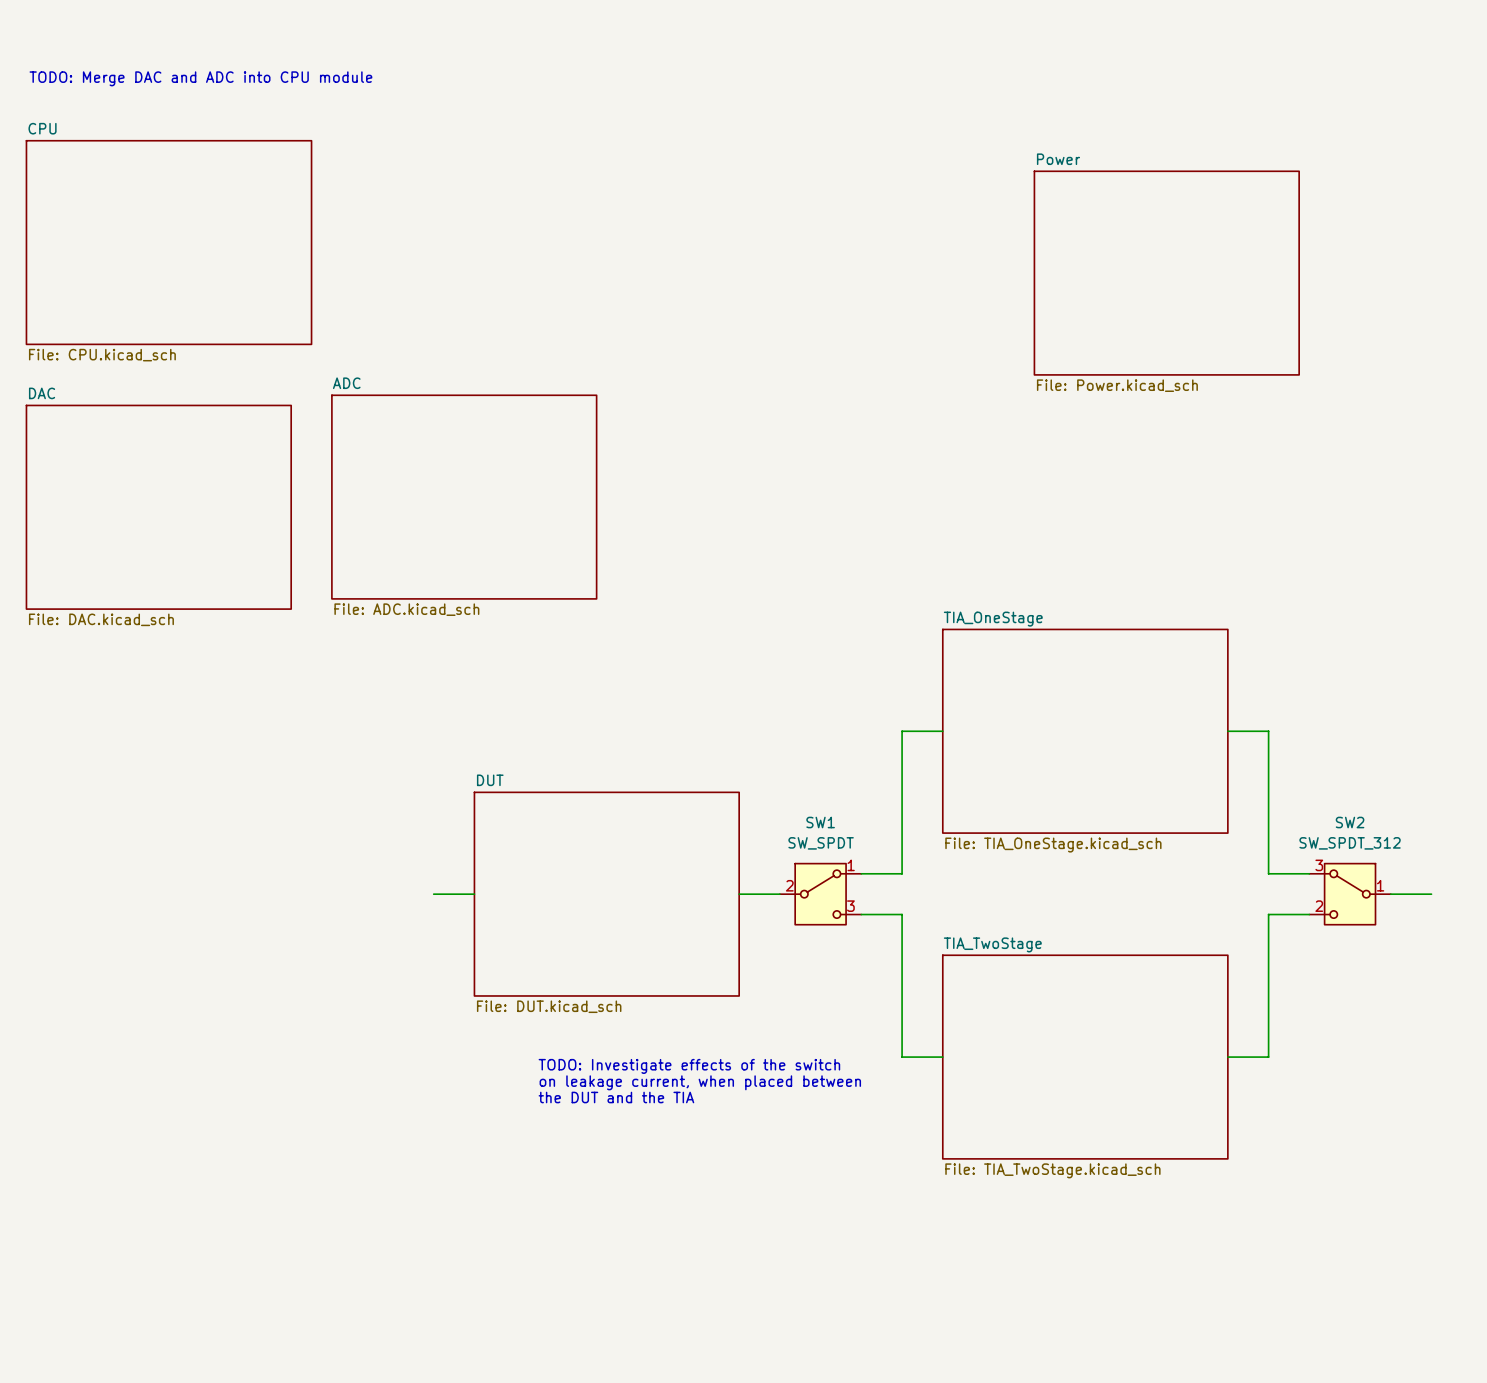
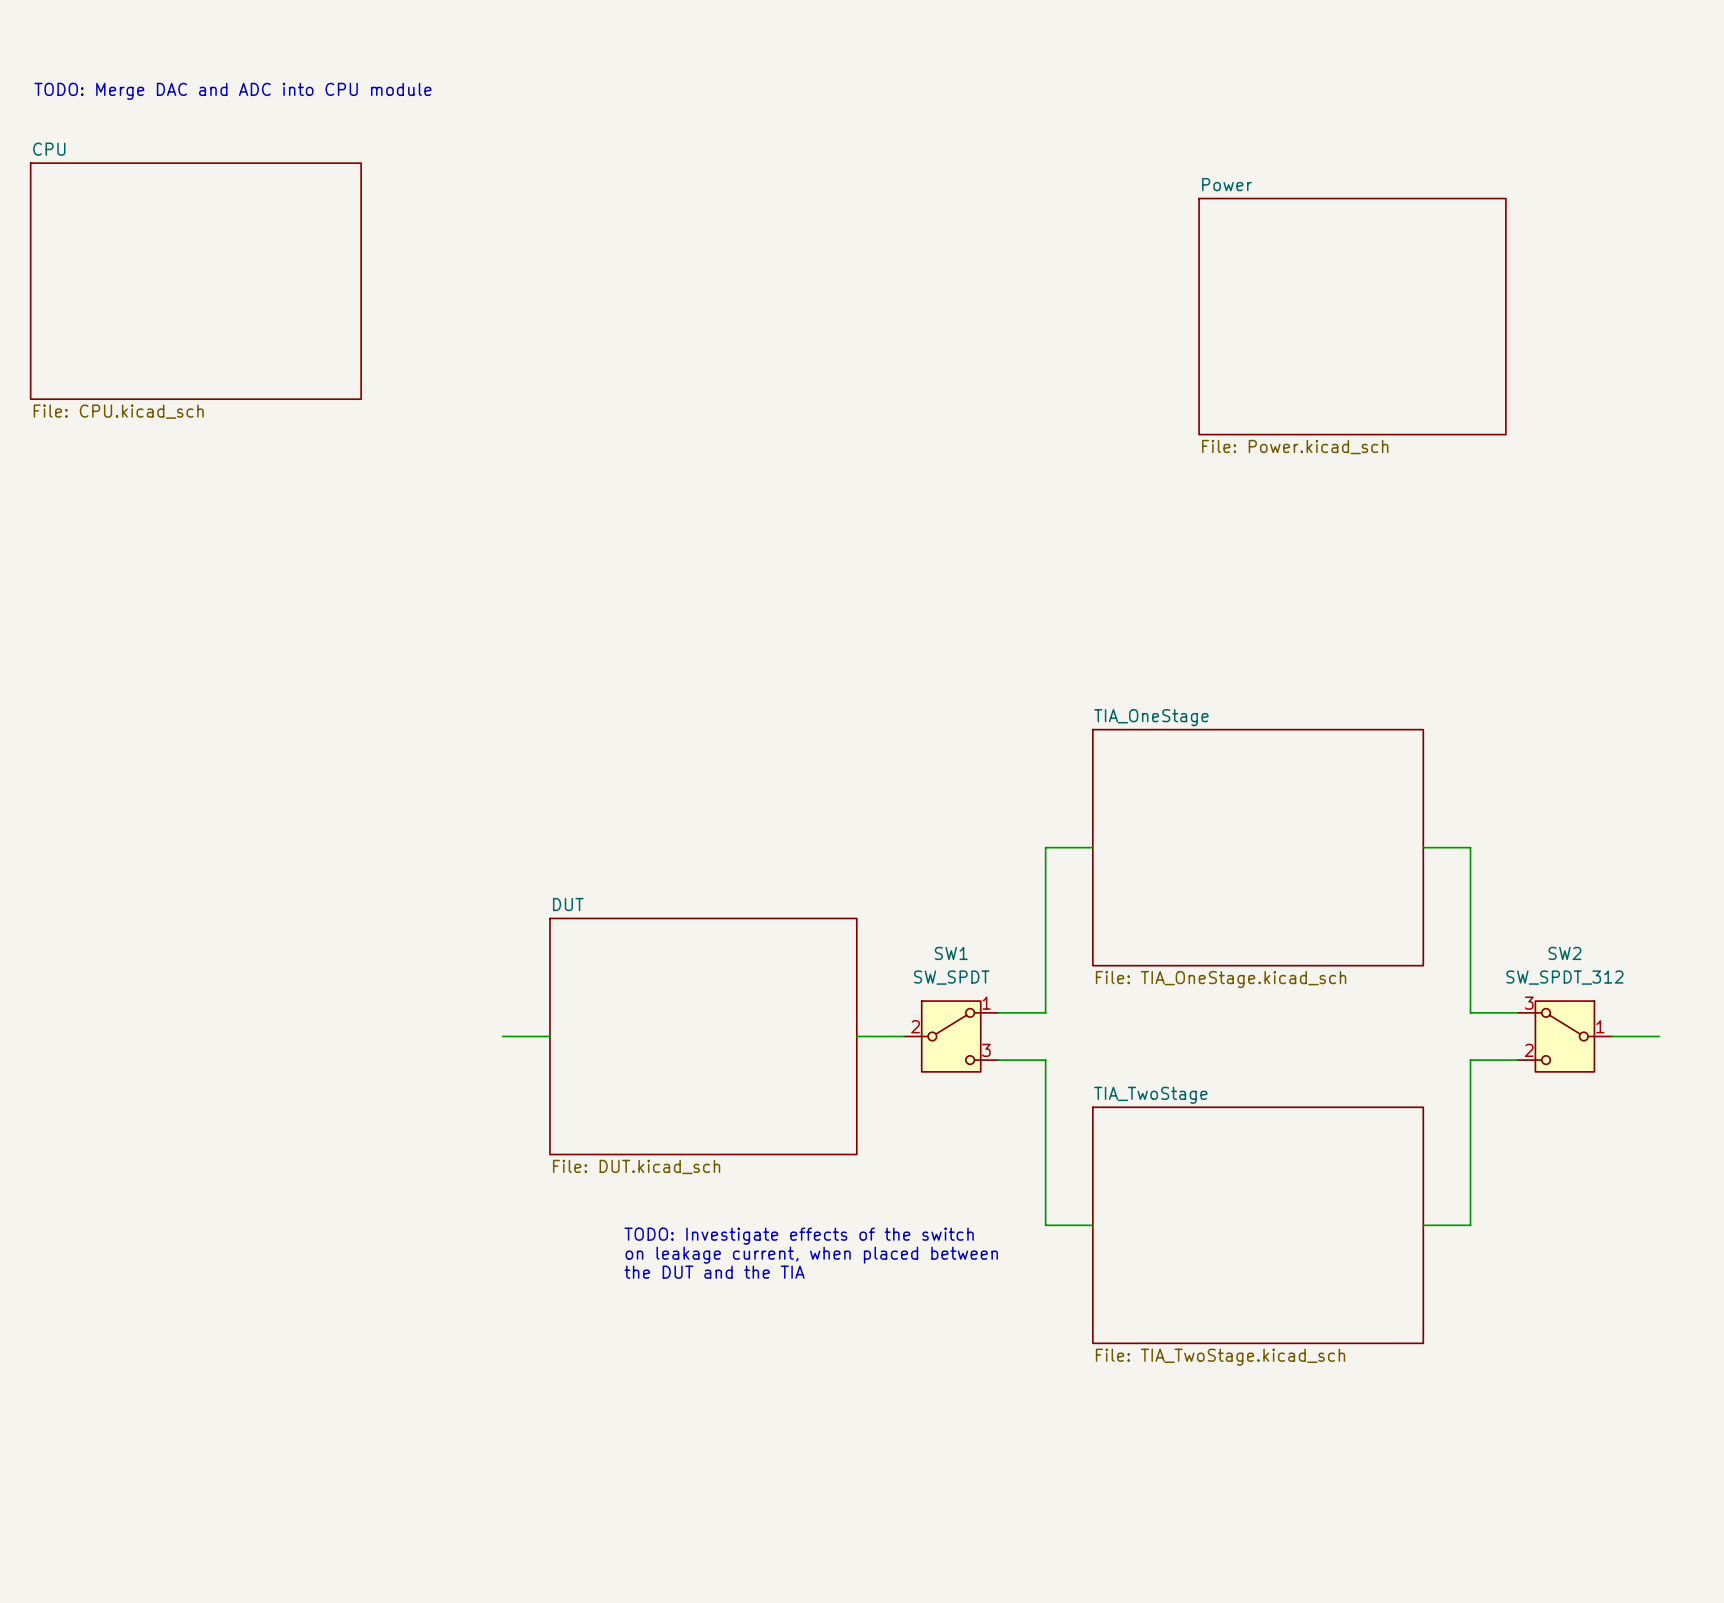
sheet ADC: File: ADC.kicad_sch (464, 497) -> none
sheet DAC: File: DAC.kicad_sch (158, 507) -> none

